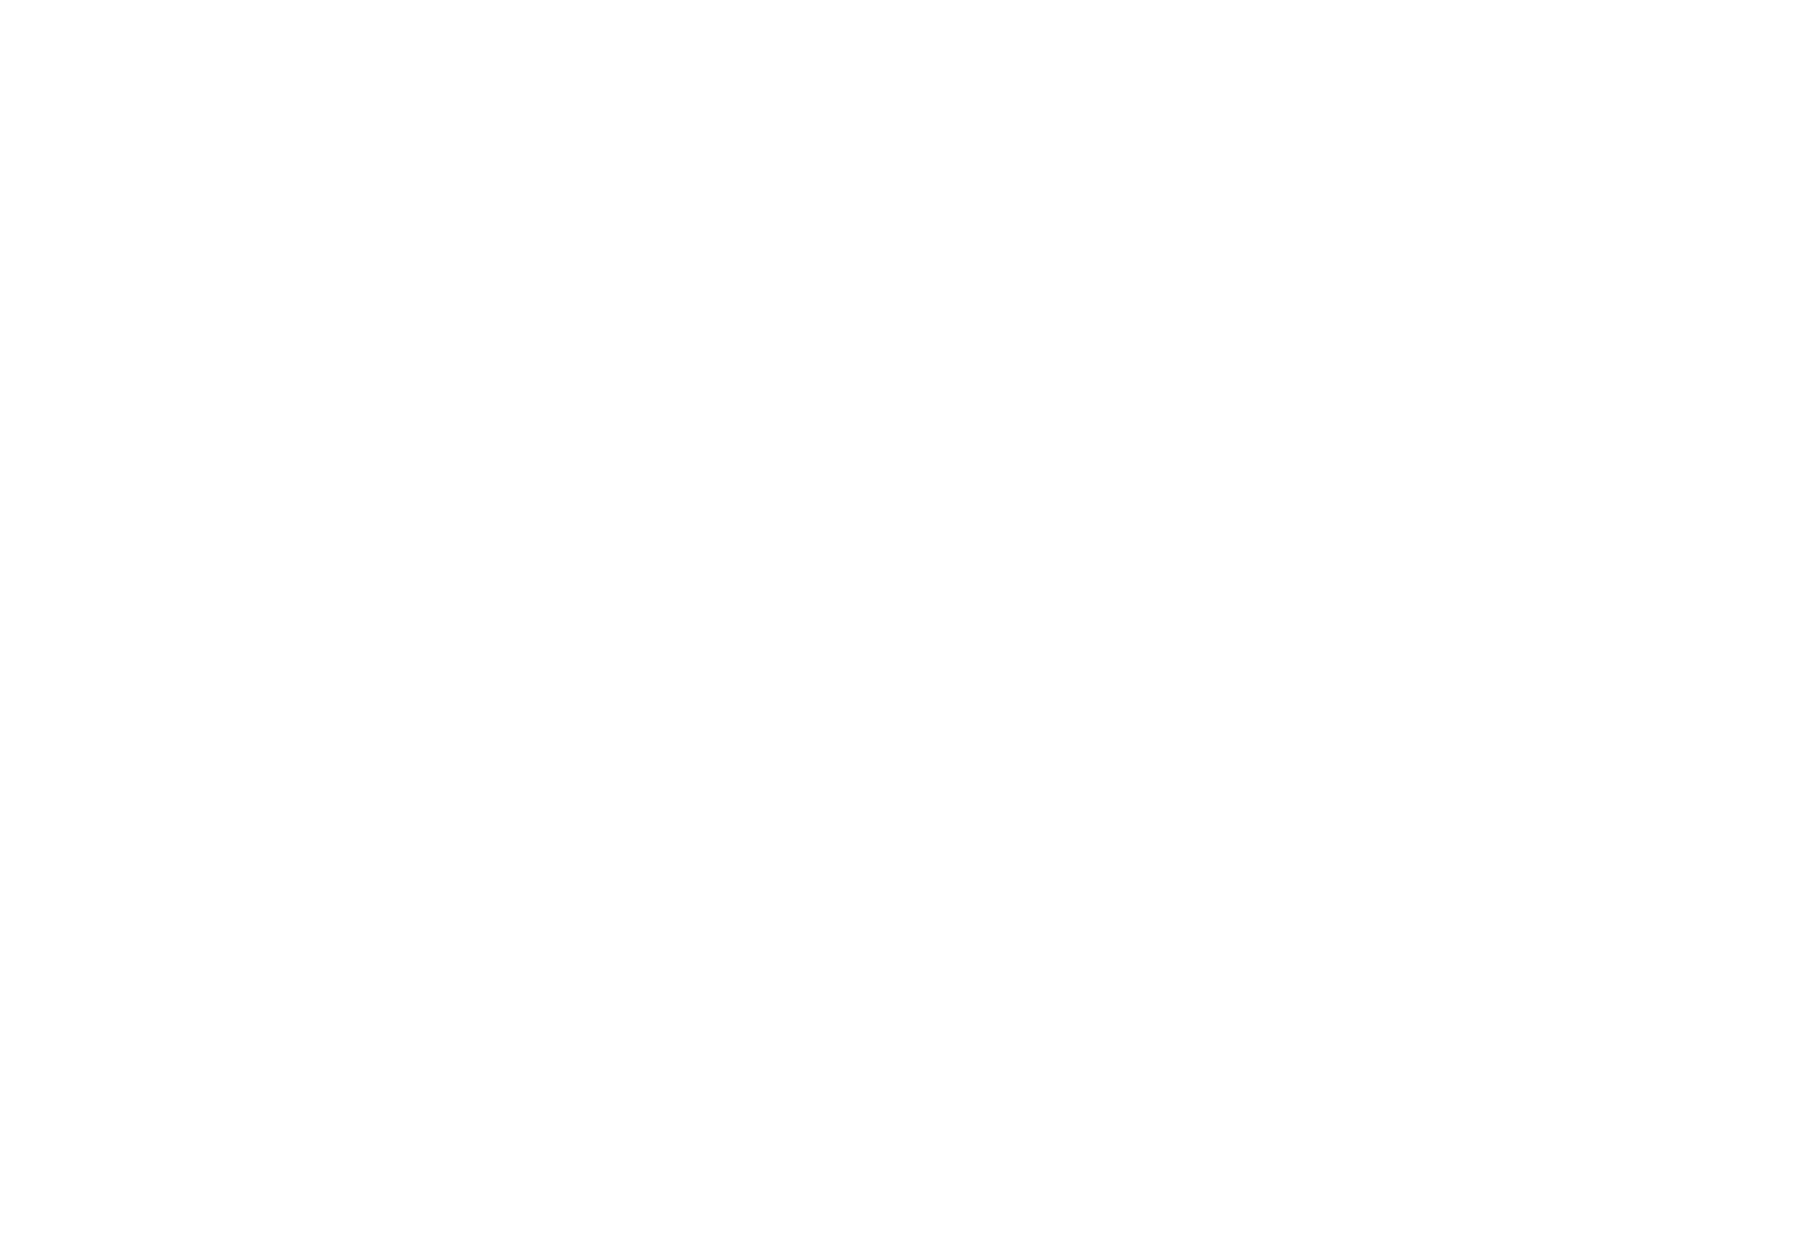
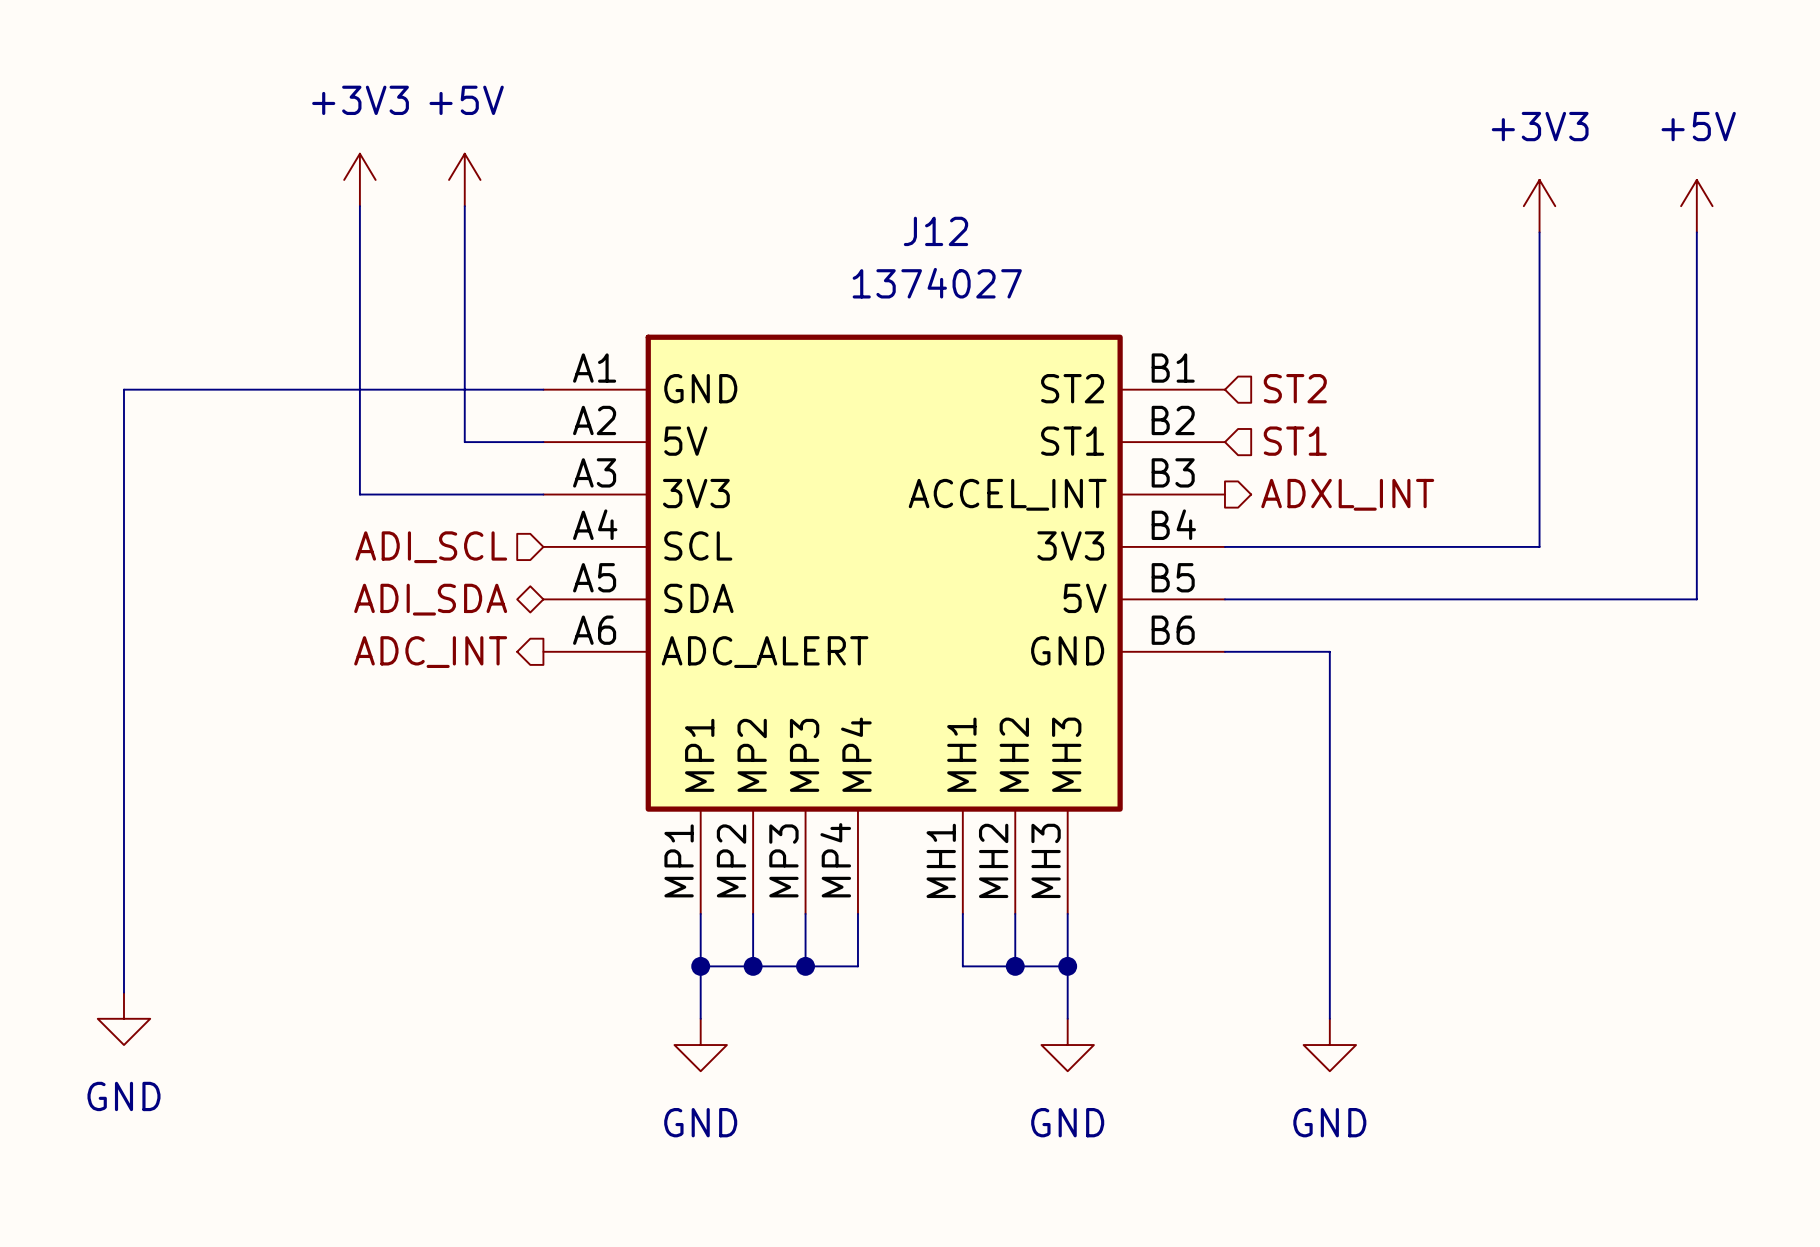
power symbol: none -> +3V3 (359, 179)
power symbol: none -> +5V (464, 179)
wire: none -> (359, 206) (359, 494) (543, 494)
wire: none -> (464, 206) (464, 442) (543, 442)
power symbol: none -> +3V3 (1539, 206)
power symbol: none -> +5V (1696, 206)
wire: none -> (1539, 232) (1539, 546) (1224, 546)
wire: none -> (1696, 232) (1696, 599) (1224, 599)
hierarchical label: none -> ST2 (1295, 388)
wire: none -> (543, 389) (123, 389) (123, 992)
hierarchical label: none -> ST1 (1295, 441)
hierarchical label: none -> ADXL_INT (1347, 494)
hierarchical label: none -> ADI_SCL (431, 547)
hierarchical label: none -> ADI_SDA (430, 599)
J12: none -> 1374027 (884, 624)
wire: none -> (1224, 651) (1329, 651) (1329, 1018)
hierarchical label: none -> ADC_INT (430, 652)
wire: none -> (700, 913) (700, 1018)
wire: none -> (753, 913) (753, 966)
wire: none -> (805, 913) (805, 966)
wire: none -> (857, 913) (857, 966) (700, 966)
wire: none -> (962, 913) (962, 966) (1067, 966)
wire: none -> (1015, 913) (1015, 966)
wire: none -> (1067, 913) (1067, 1018)
junction: none -> (700, 966)
junction: none -> (753, 966)
junction: none -> (805, 966)
junction: none -> (1015, 966)
junction: none -> (1067, 966)
power symbol: none -> GND (123, 1018)
power symbol: none -> GND (700, 1045)
power symbol: none -> GND (1067, 1045)
power symbol: none -> GND (1329, 1045)

